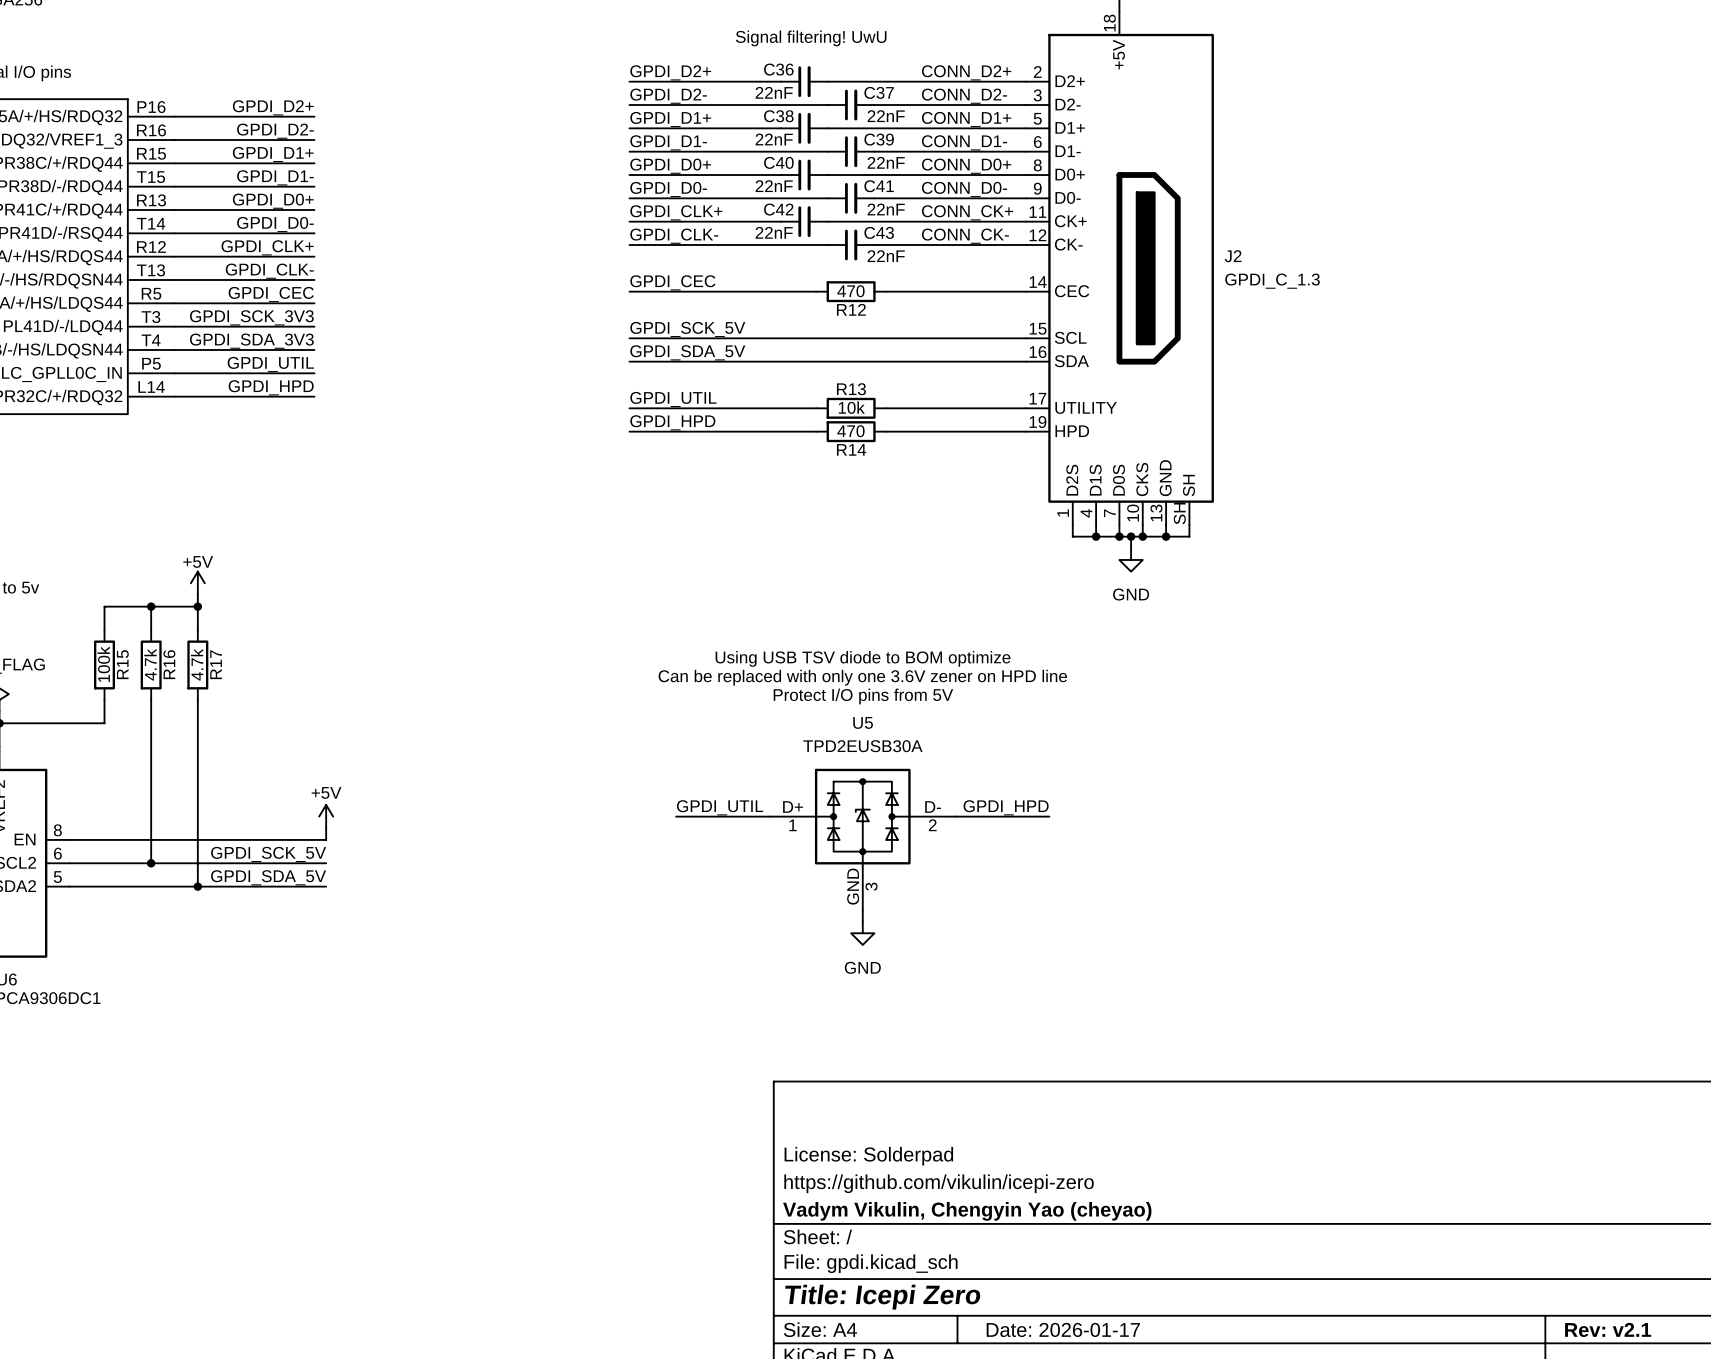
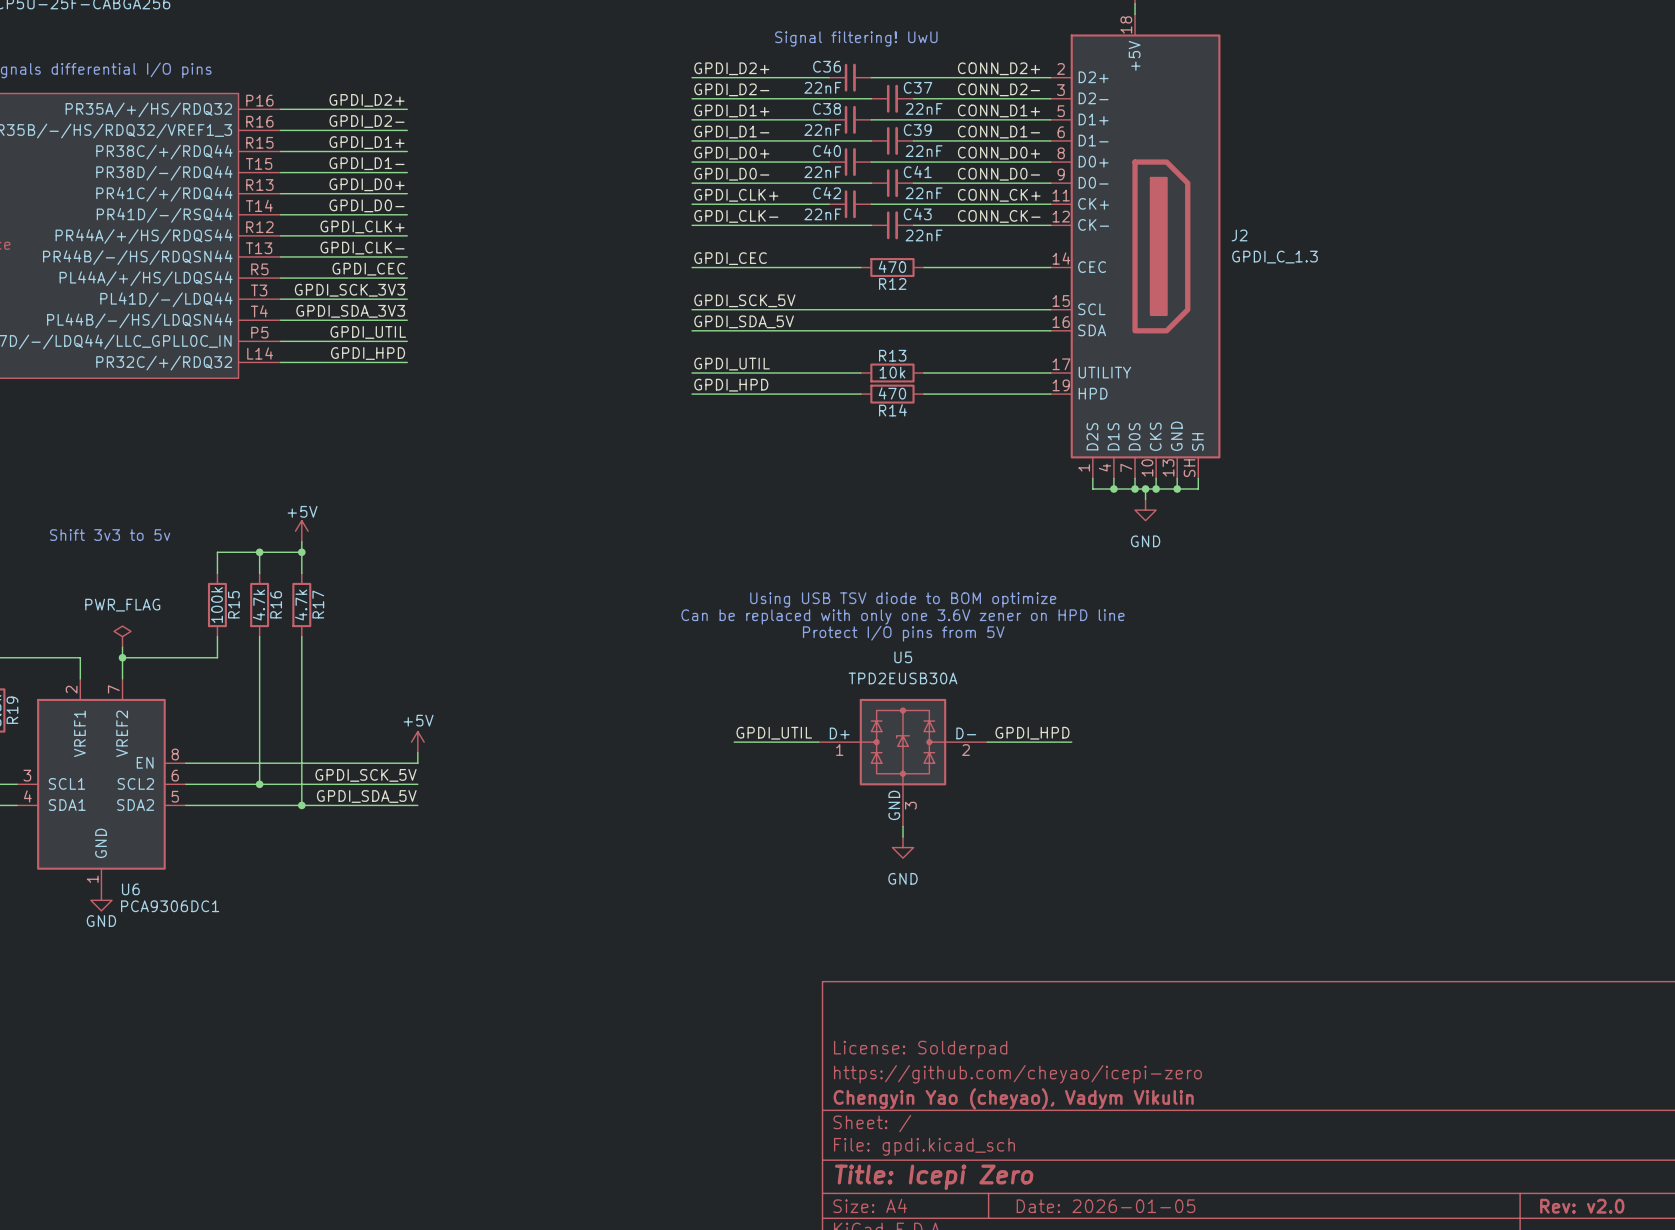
title block: https://github.com/vikulin/icepi-zero (939, 1183) -> https://github.com/cheyao/icepi-zero (1017, 1074)
title block: Vadym Vikulin, Chengyin Yao (cheyao) (967, 1211) -> Chengyin Yao (cheyao), Vadym Vikulin (1013, 1098)
title block: Date: 2026-01-17 (1063, 1329) -> Date: 2026-01-05 (1106, 1206)
title block: Rev: v2.1 (1608, 1329) -> Rev: v2.0 (1582, 1206)

